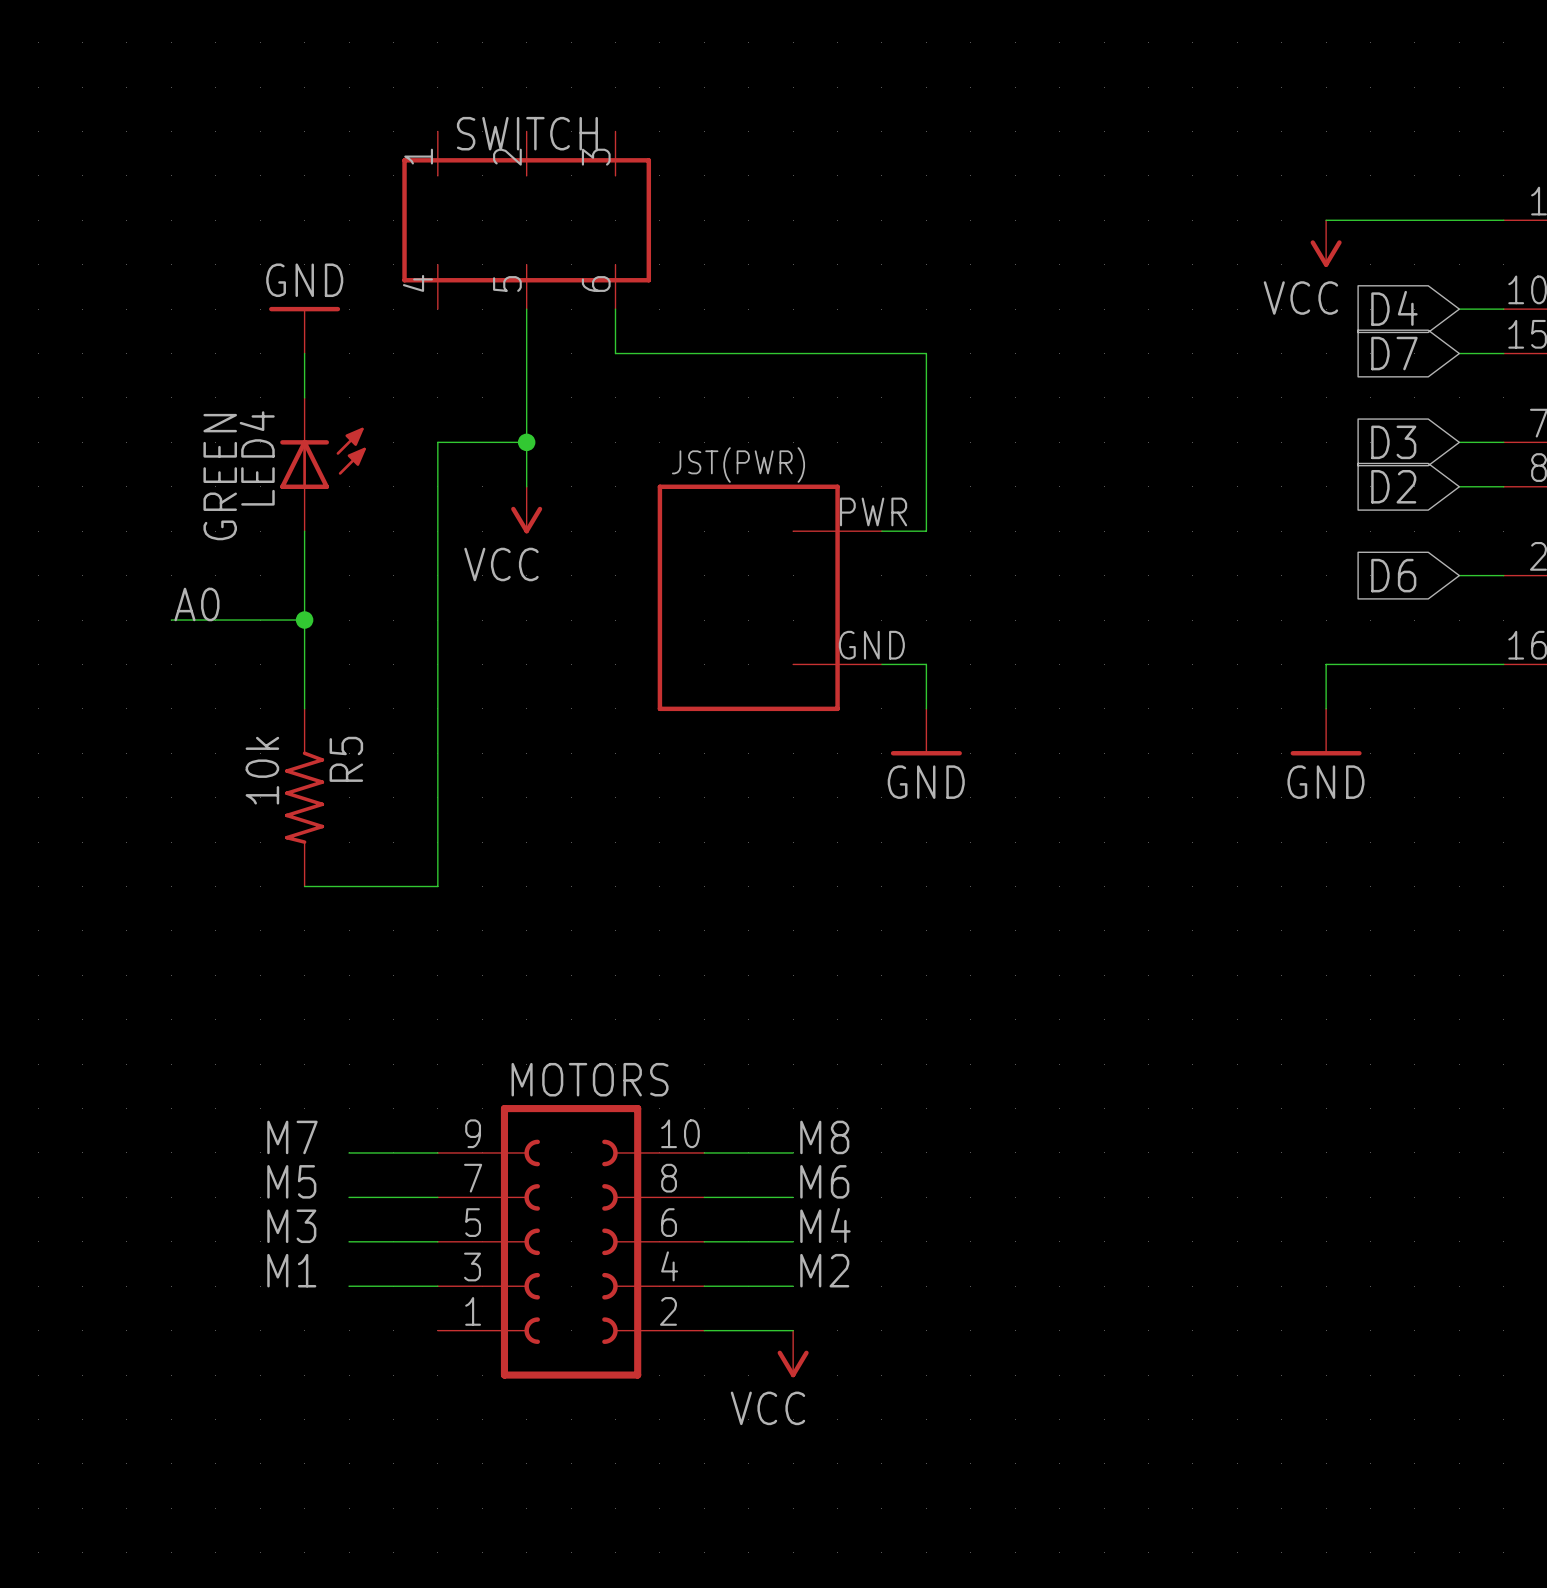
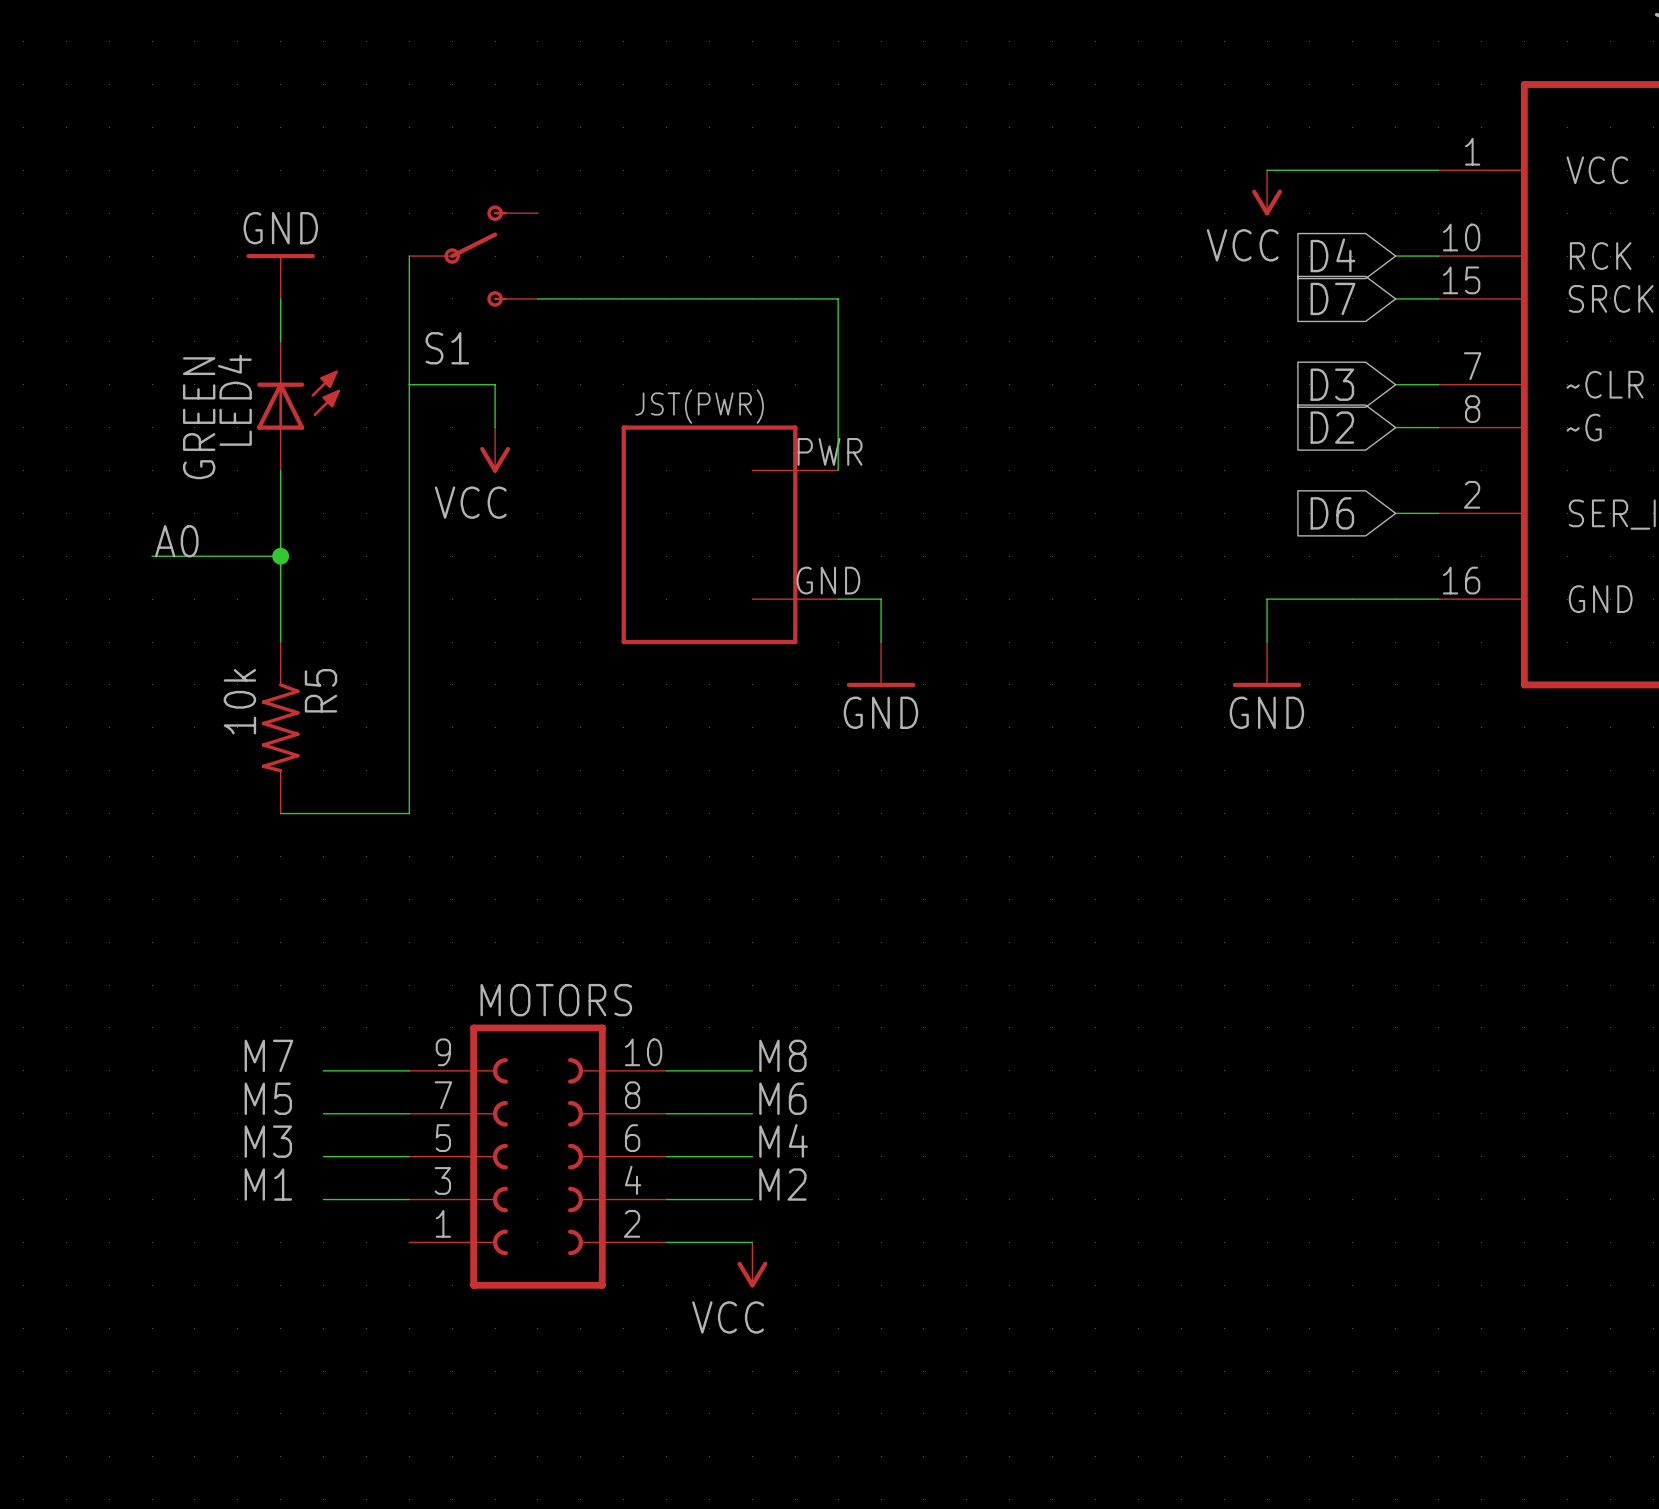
text: SWITCH (527, 133) -> none
part: (526, 220) -> none
S1: none -> (473, 256)
wire: (526, 309) (526, 442) -> (409, 256) (409, 384)
wire: (615, 309) (615, 353) -> (537, 298) (580, 298)
wire: (881, 353) (926, 353) (926, 531) (881, 531) -> (838, 298) (838, 470)
junction: (526, 442) -> none

